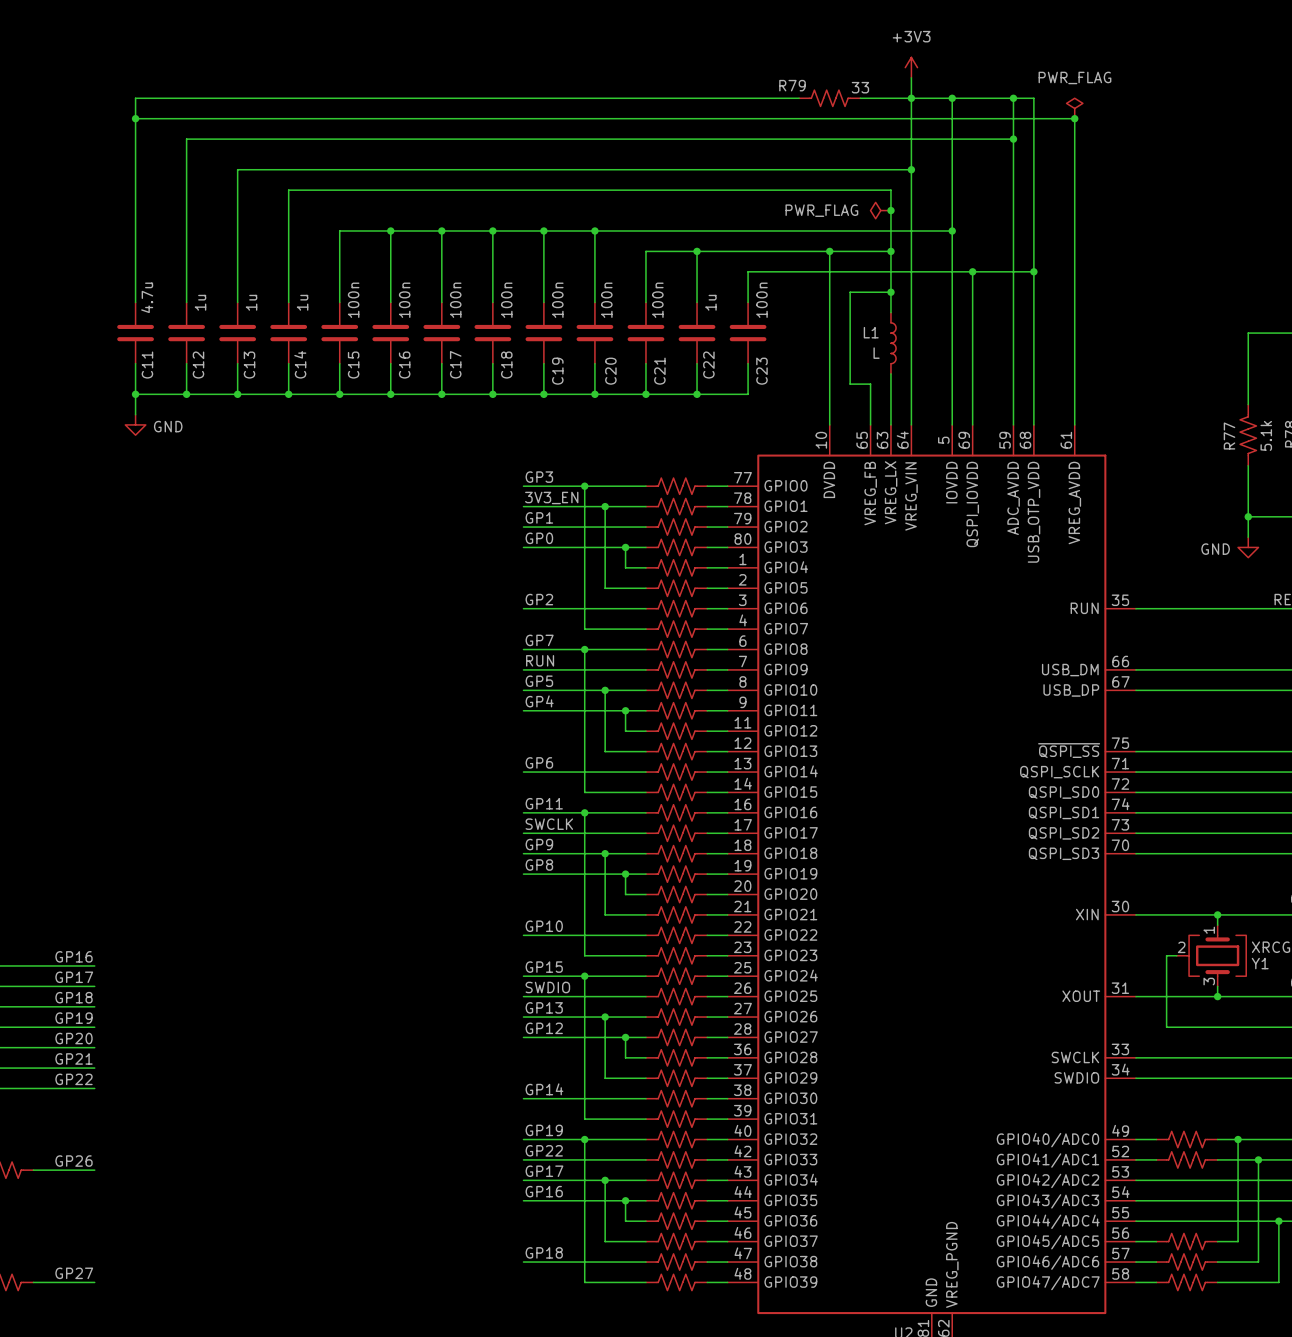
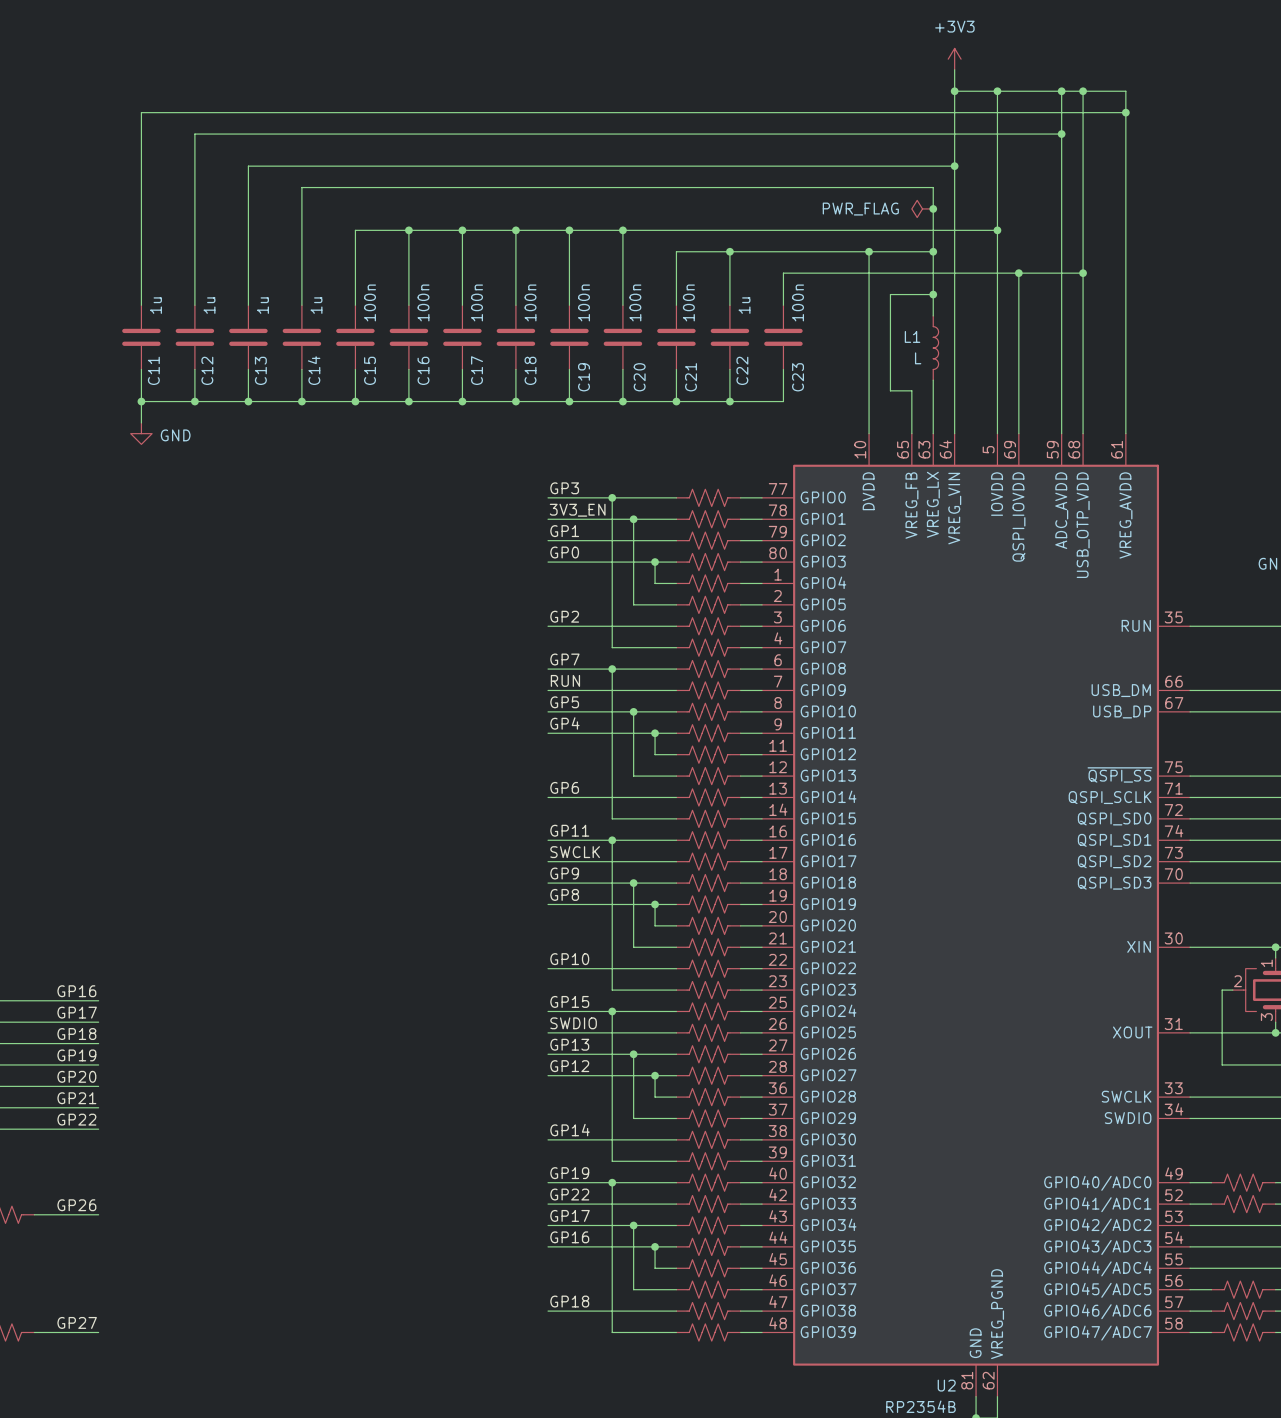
wire: (799, 98) (135, 98) (135, 118) -> none
R79: 33 (829, 98) -> none
wire: (860, 98) (911, 98) -> none
wire: none -> (1083, 91) (1125, 91) (1125, 112)
junction: none -> (1083, 91)
power symbol: PWR_FLAG (1074, 108) -> none
junction: (135, 118) -> none
C11 value: 4.7u (147, 297) -> 1u (156, 305)

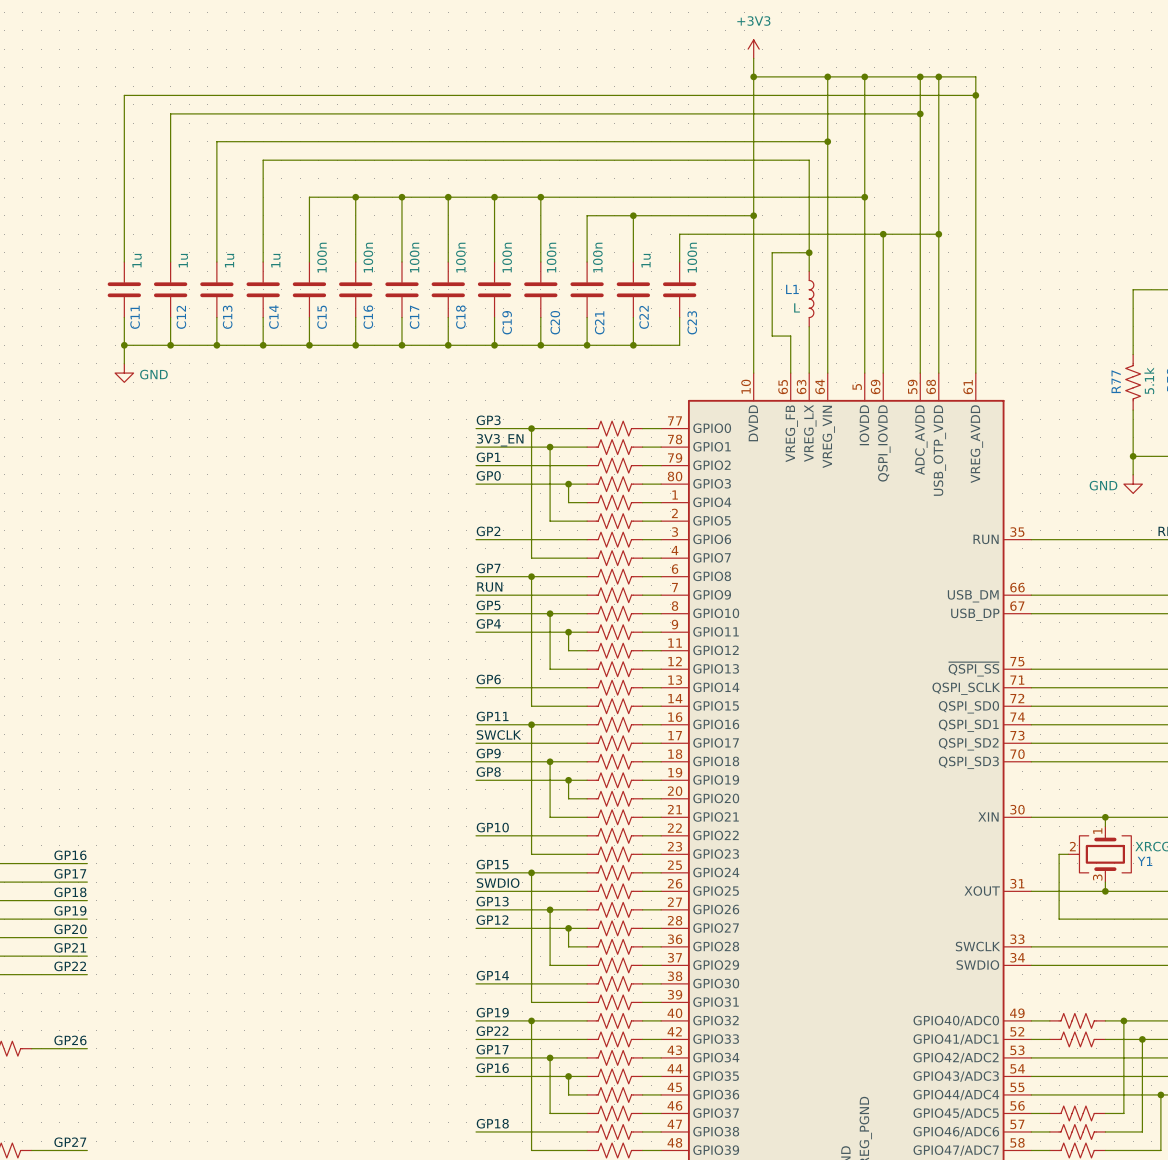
power symbol position: +3V3 (954, 59) -> +3V3 (753, 49)
wire: (954, 69) (954, 91) -> (753, 76) (827, 76)
junction: none -> (753, 76)
power symbol: PWR_FLAG (922, 208) -> none
junction: (933, 208) -> none
wire: (869, 251) (933, 251) -> (753, 215) (753, 58)
junction: (933, 251) -> none

